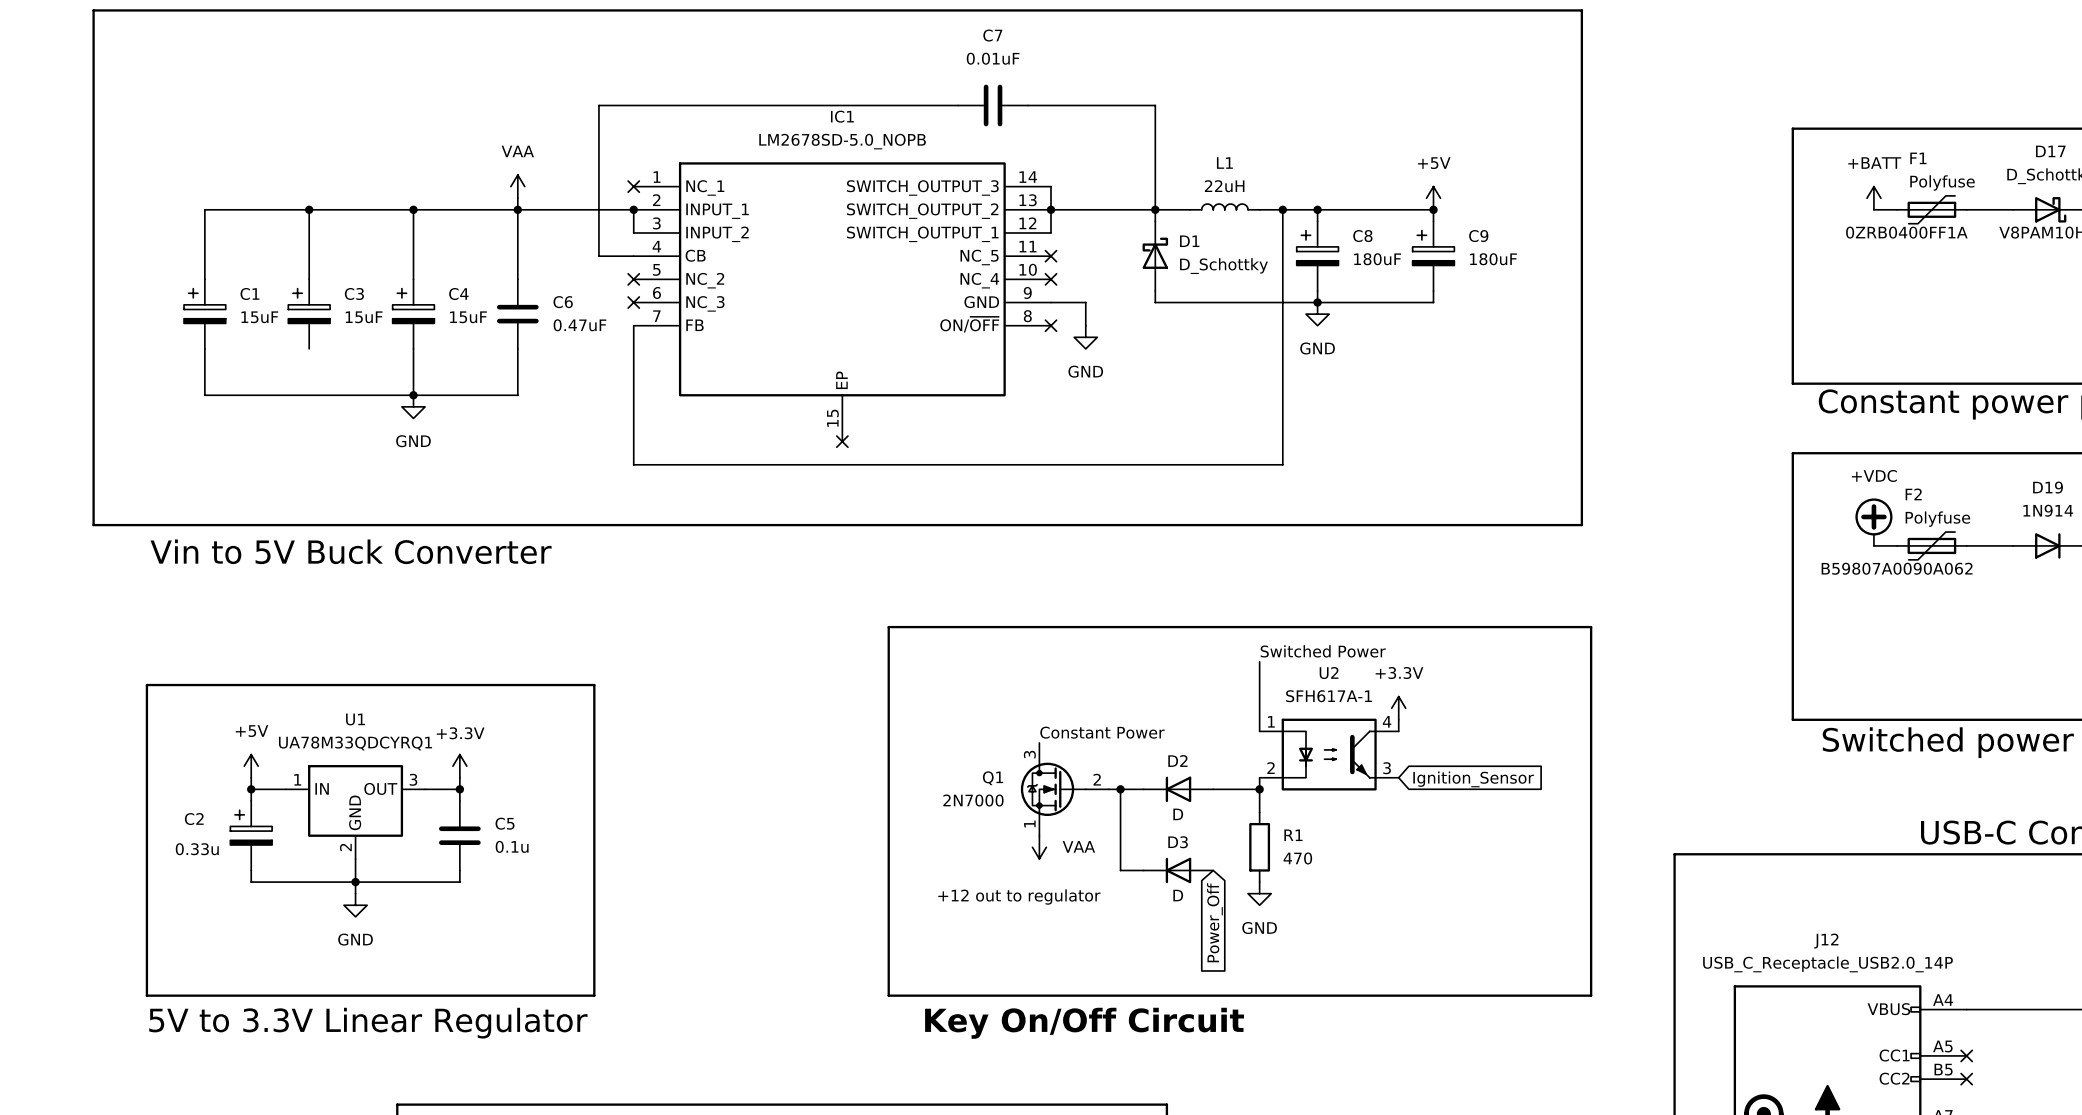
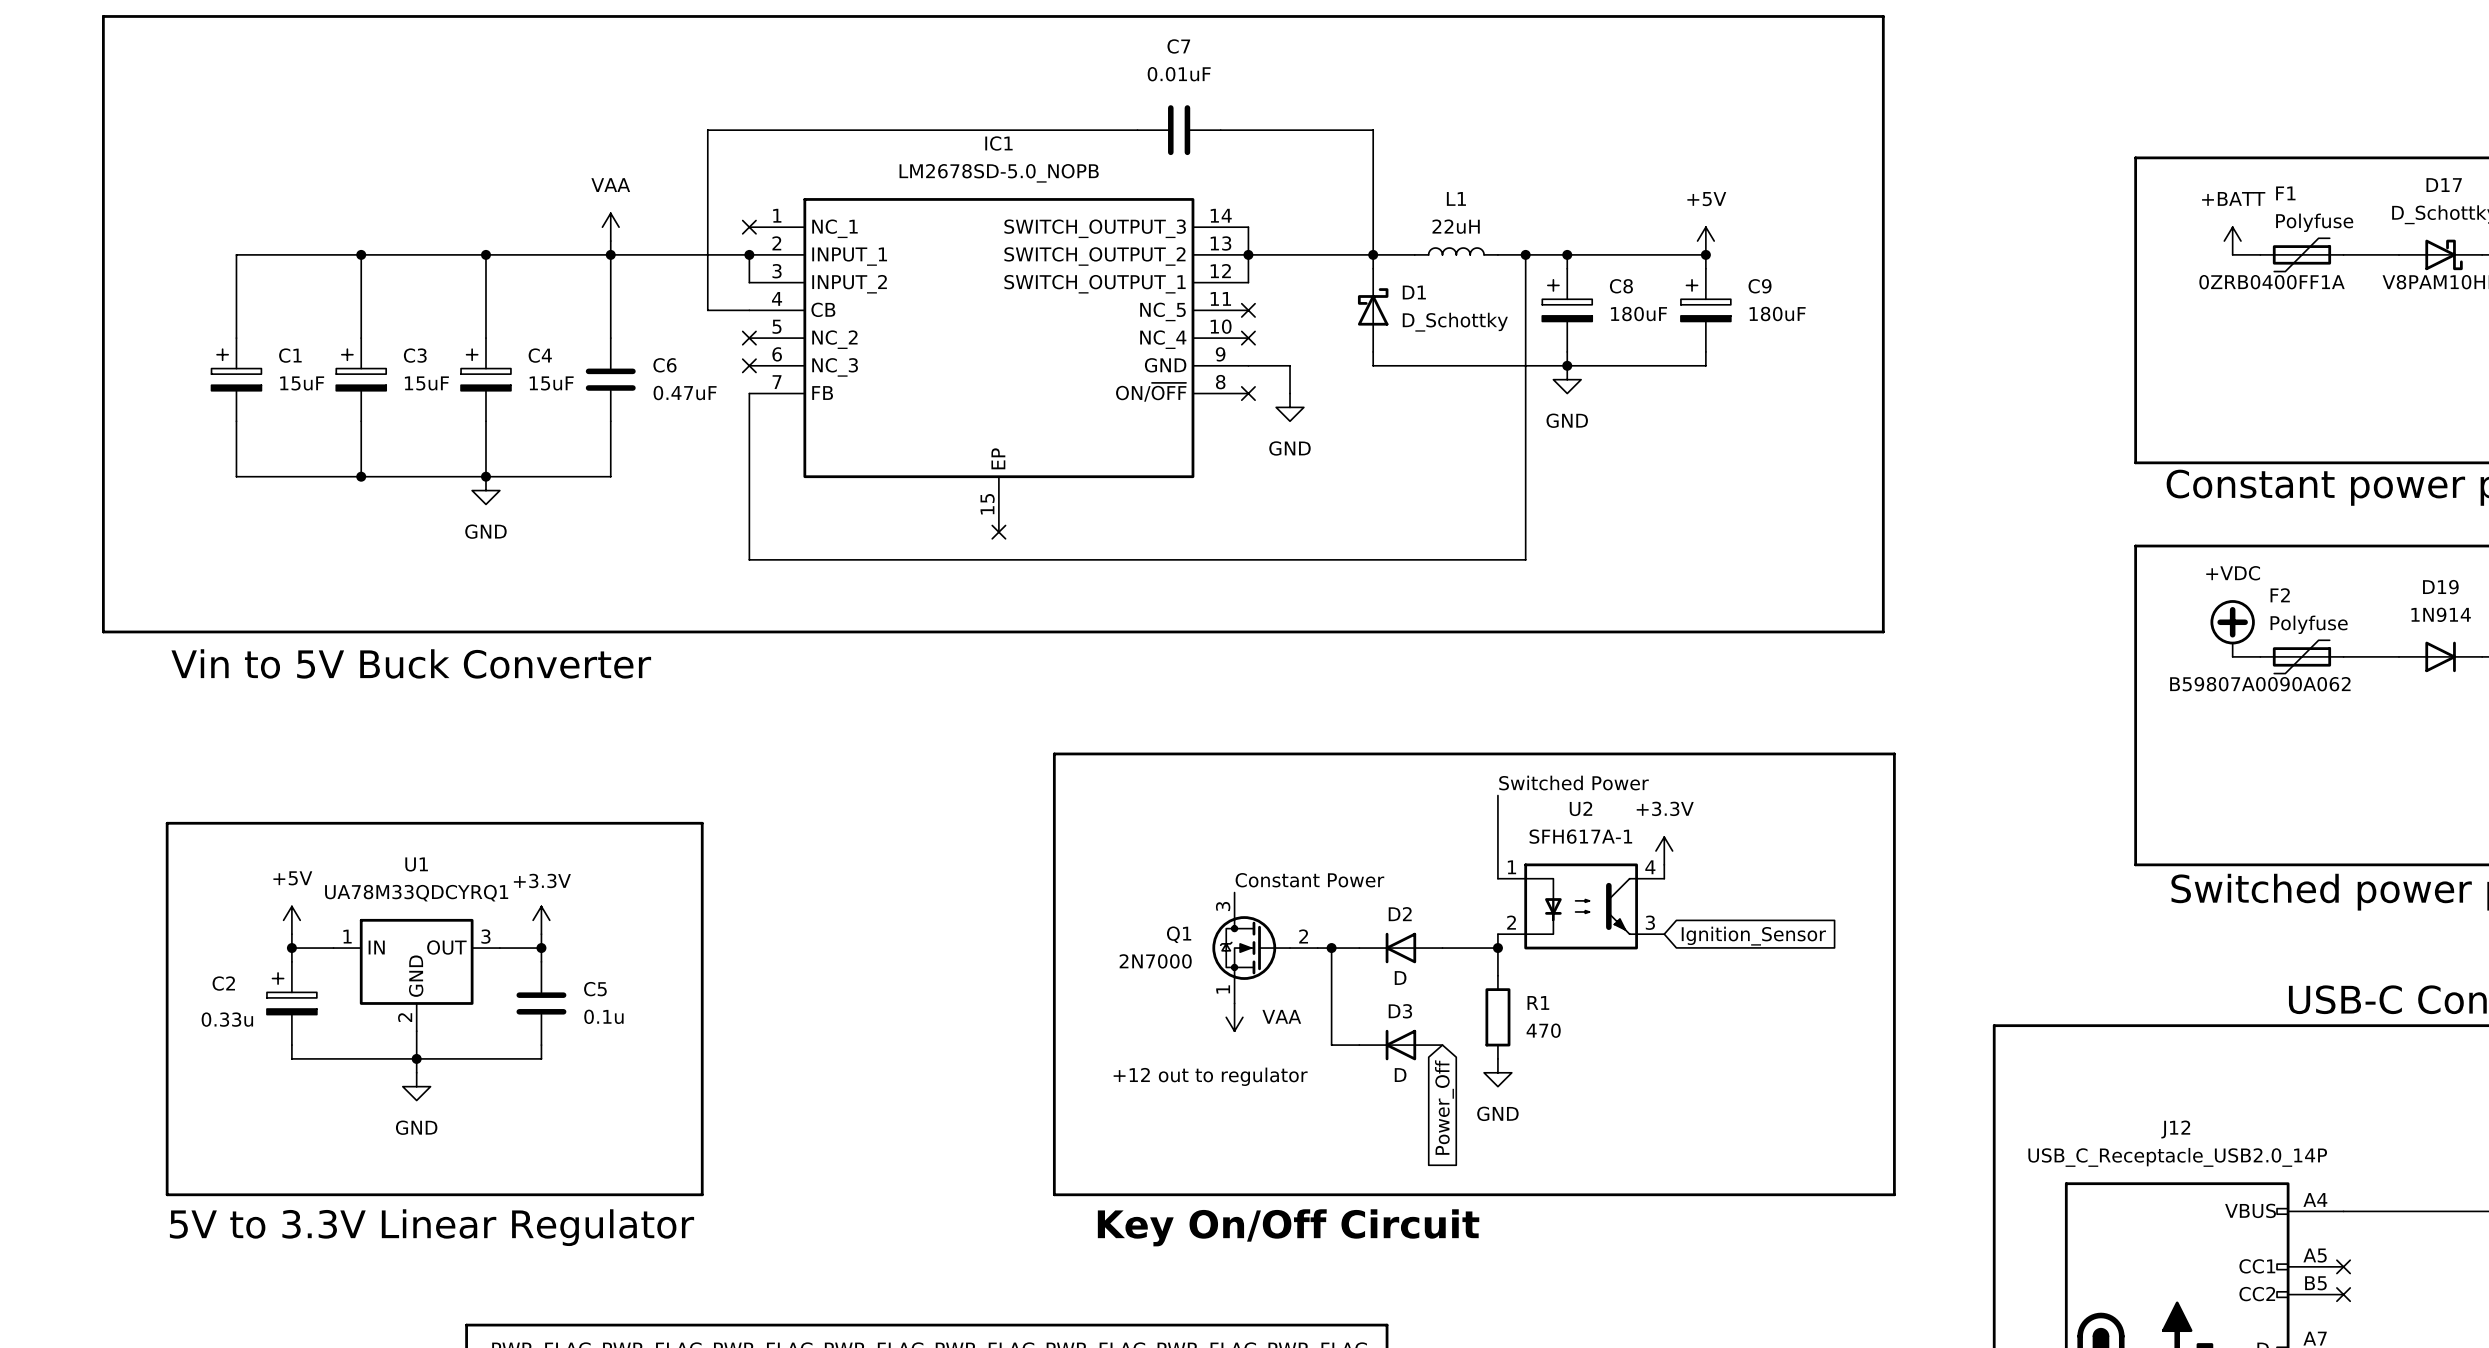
wire: none -> (361, 421) (361, 476)
junction: none -> (361, 476)

